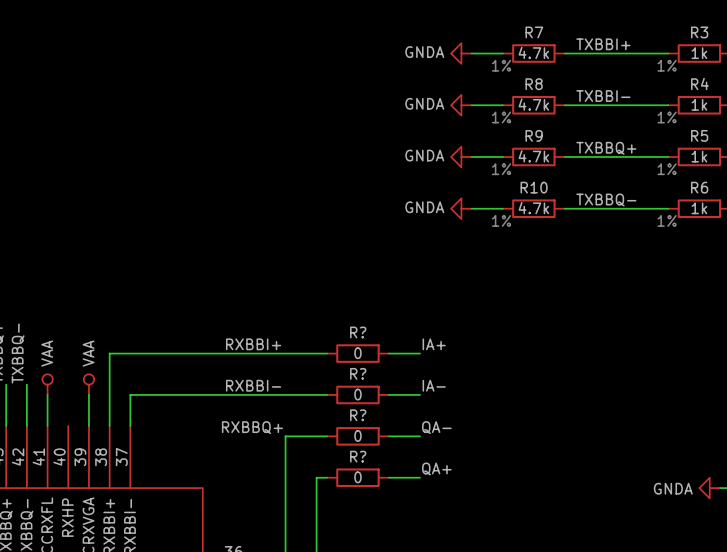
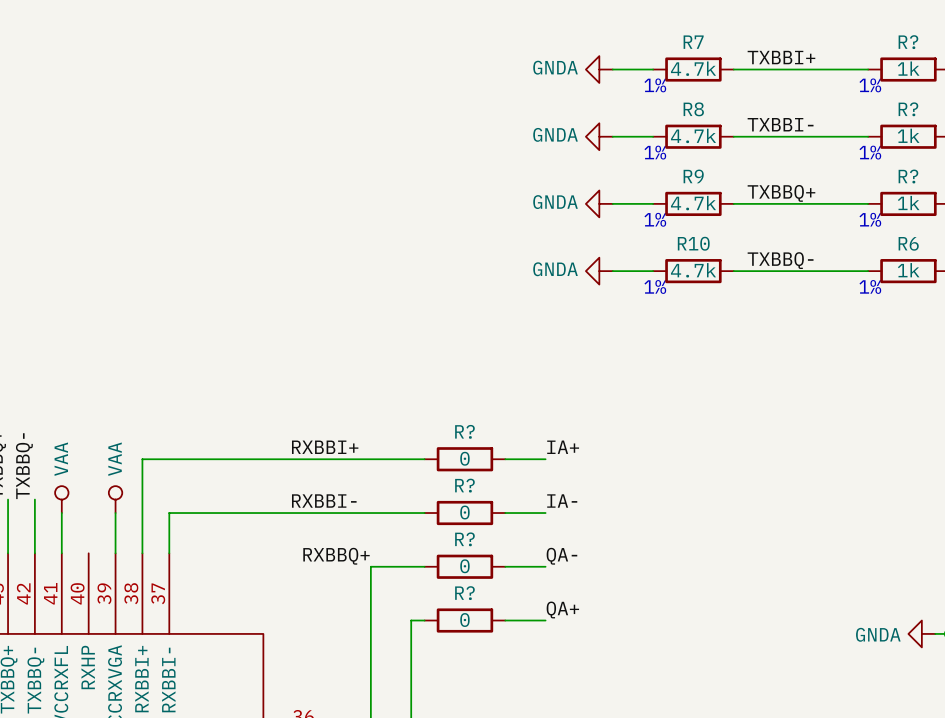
R3 name: R3 (699, 32) -> R? (908, 42)
R4 name: R4 (699, 83) -> R? (908, 109)
R5 name: R5 (699, 135) -> R? (908, 176)

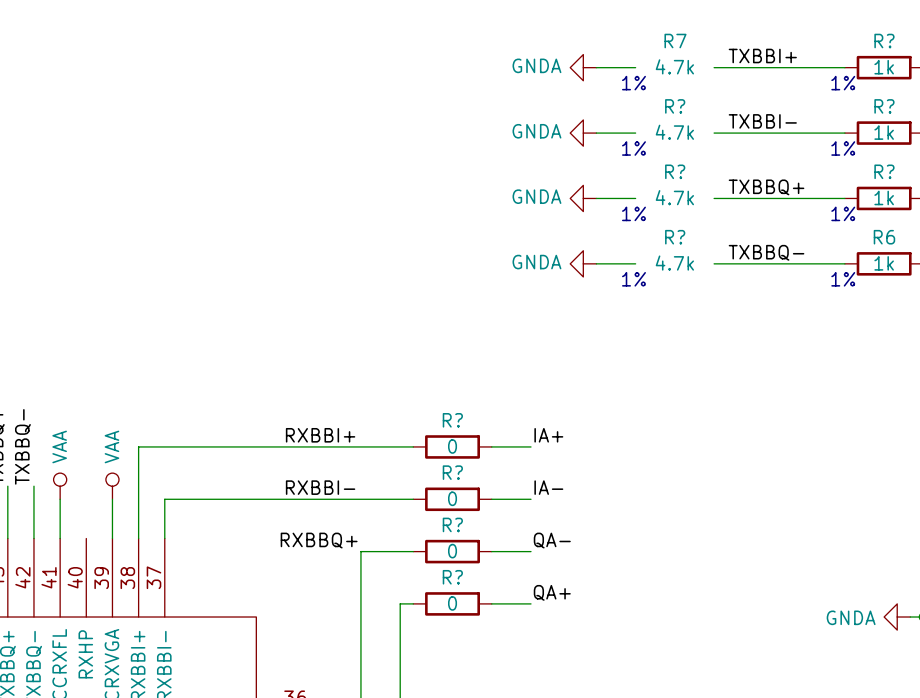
R7 symbol: [653, 57, 734, 82] -> [655, 33, 695, 75]
R?: none -> 4.7k (674, 119)
R8: 4.7k (693, 136) -> none
R?: none -> 4.7k (674, 184)
R9: 4.7k (693, 203) -> none
R?: none -> 4.7k (674, 250)
R10: 4.7k (693, 271) -> none

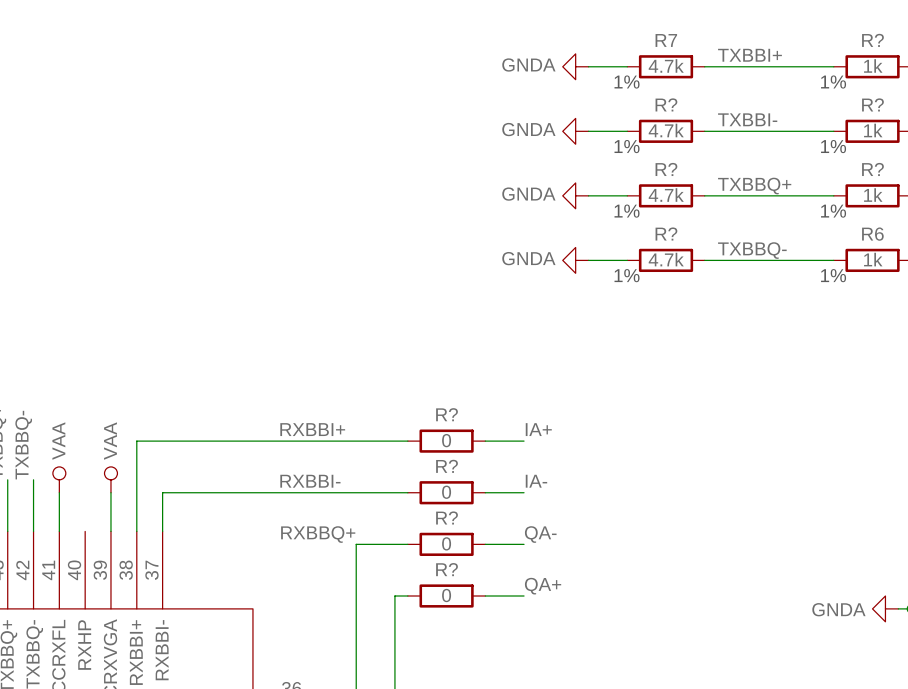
R7 symbol: [655, 33, 695, 75] -> [627, 55, 705, 79]
R?: 4.7k (674, 119) -> none
R?: none -> 4.7k (666, 131)
R?: 4.7k (674, 184) -> none
R?: none -> 4.7k (666, 195)
R?: 4.7k (674, 250) -> none
R?: none -> 4.7k (666, 260)

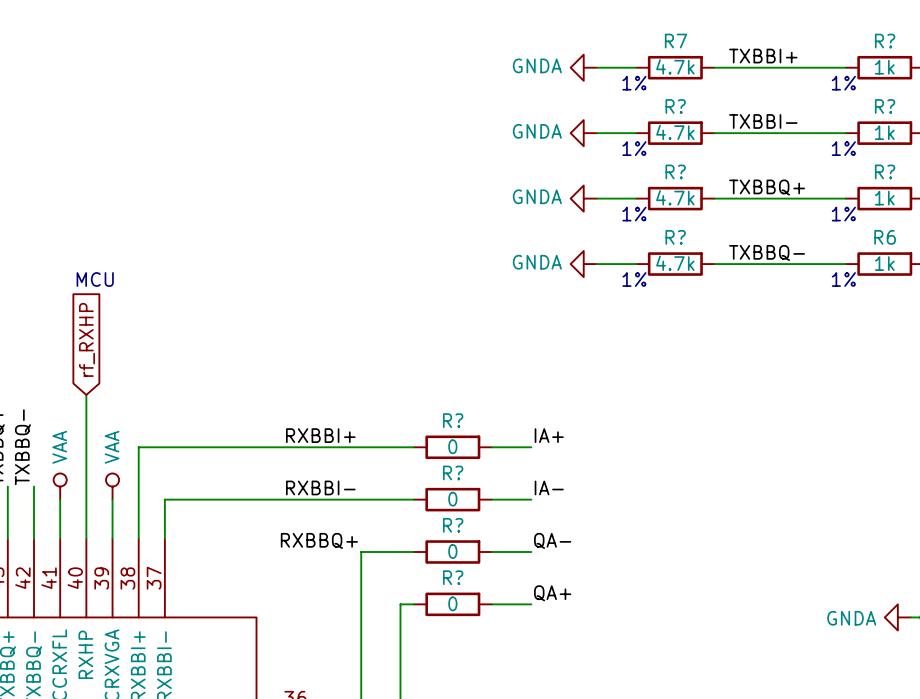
text: none -> MCU (95, 279)
global label: none -> rf_RXHP (86, 339)
wire: none -> (86, 394) (86, 538)

